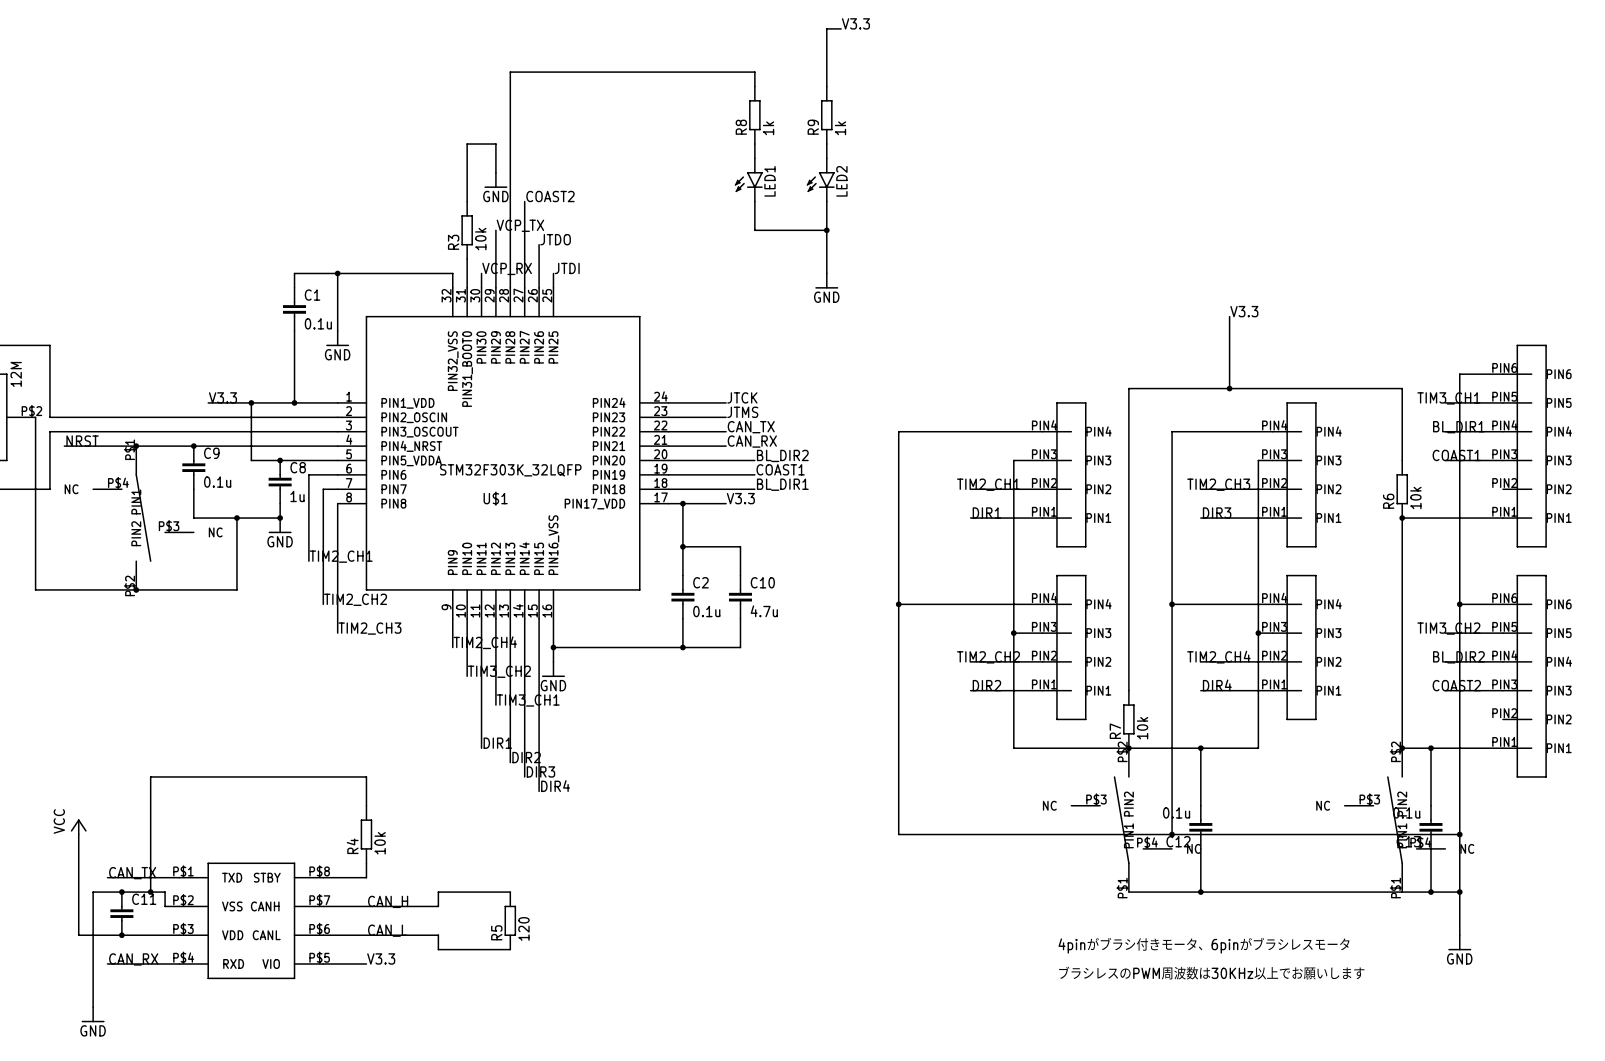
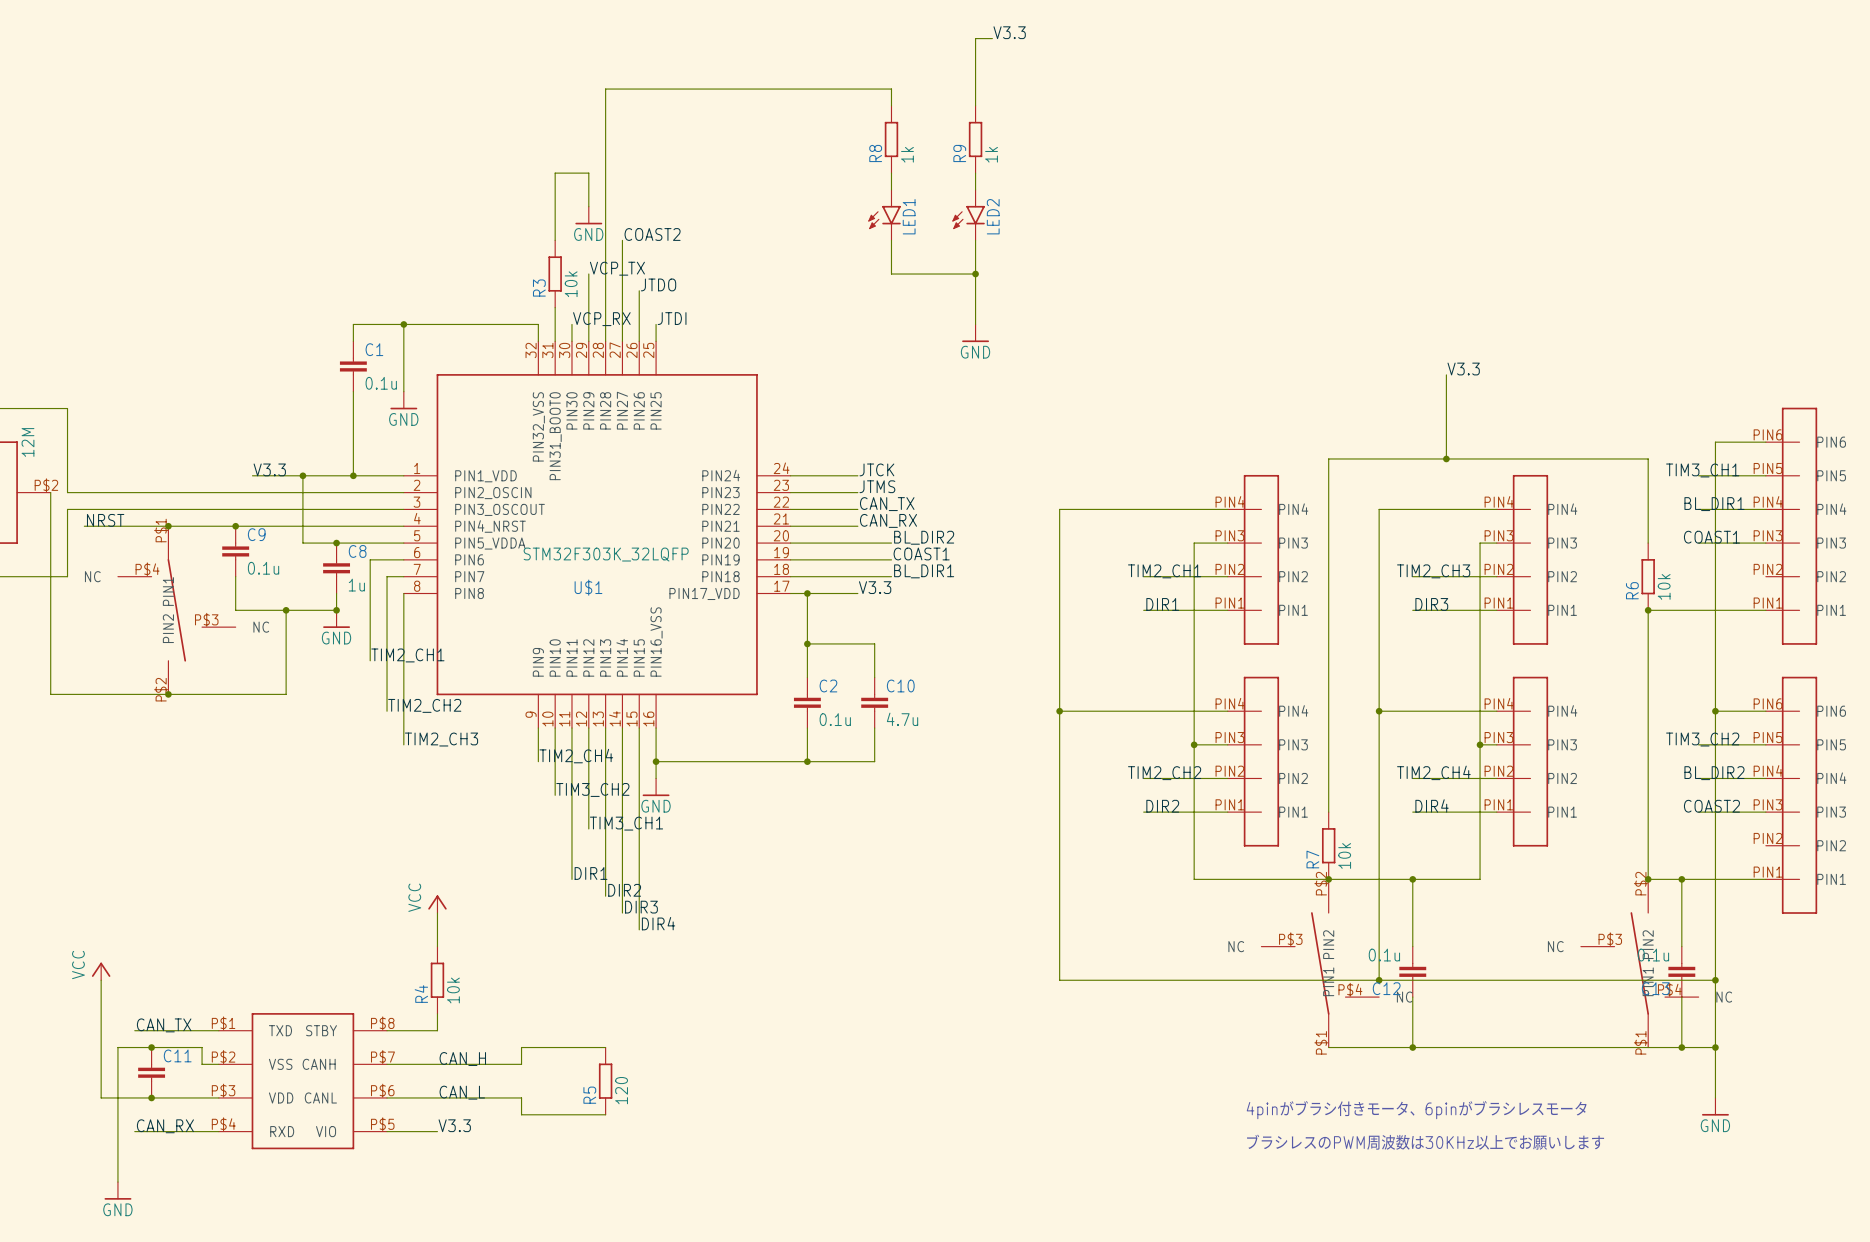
power symbol: none -> VCC (437, 904)
wire: (366, 776) (150, 776) (150, 892) -> none
junction: (150, 892) -> none

